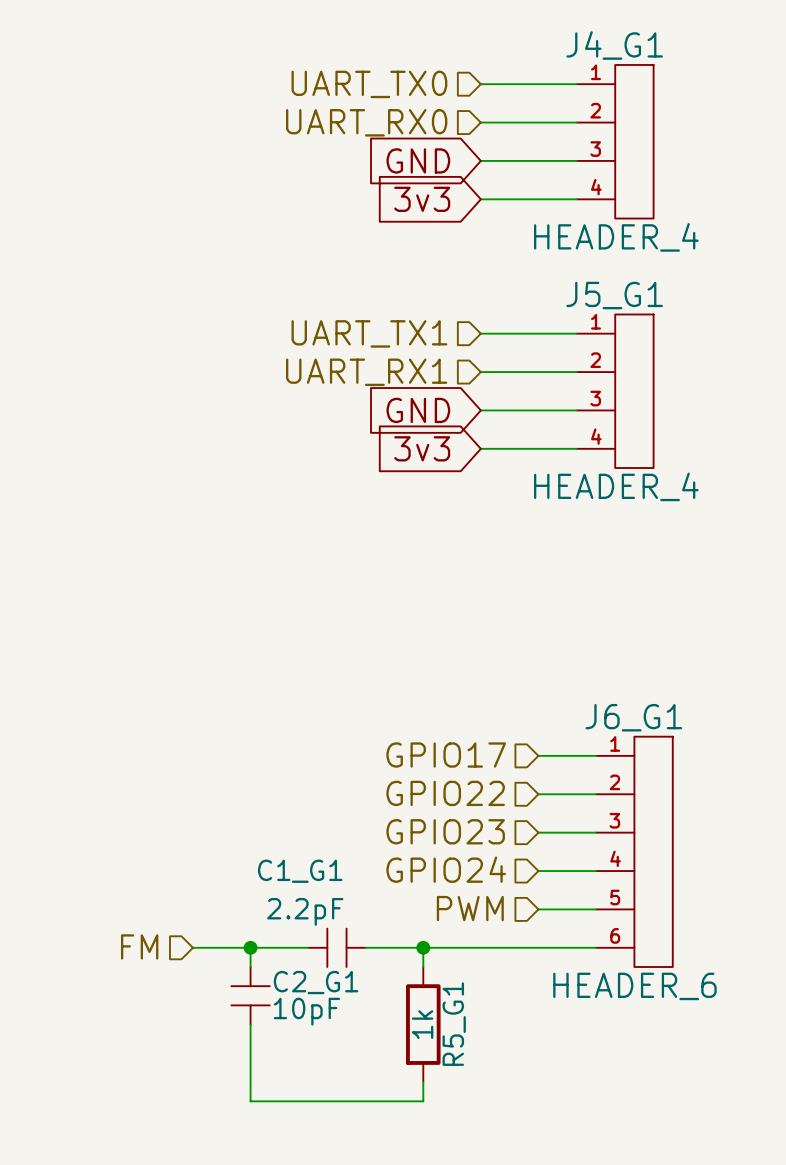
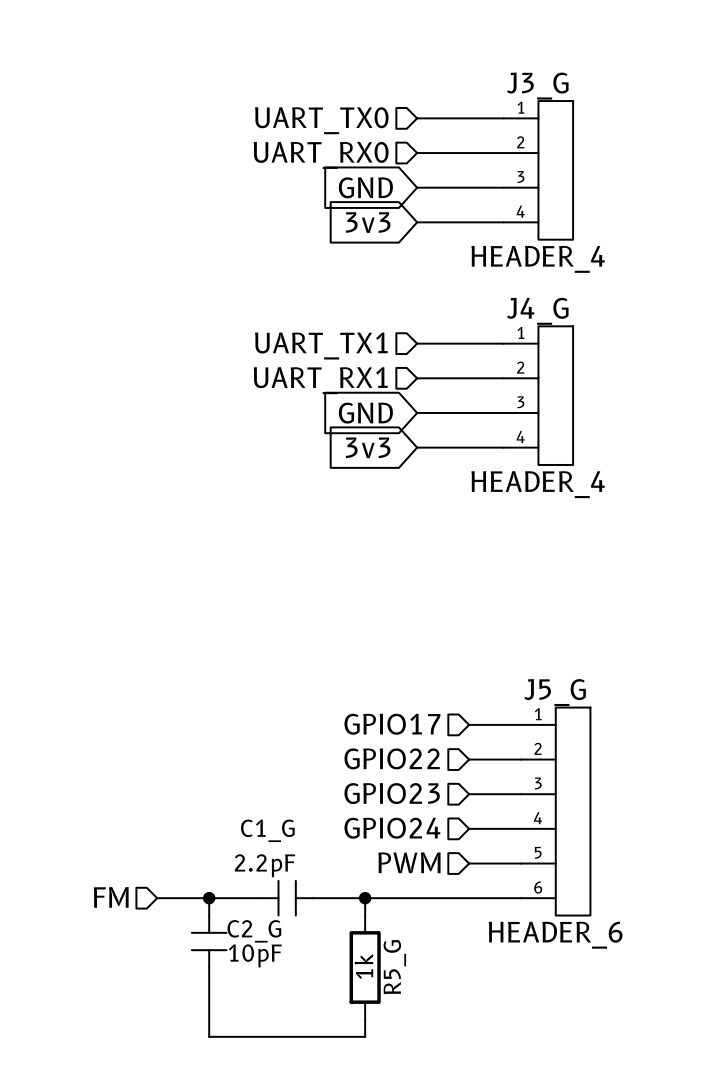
J4_G1 name: J4_G1 (614, 45) -> J3_G (537, 86)
J5_G1 name: J5_G1 (614, 295) -> J4_G (537, 311)
J6_G1 name: J6_G1 (633, 717) -> J5_G (555, 692)
C1_G1 name: C1_G1 (300, 871) -> C1_G (267, 830)
C2_G1 name: C2_G1 (316, 982) -> C2_G (254, 931)
R5_G1 name: R5_G1 (454, 1024) -> R5_G (394, 967)

